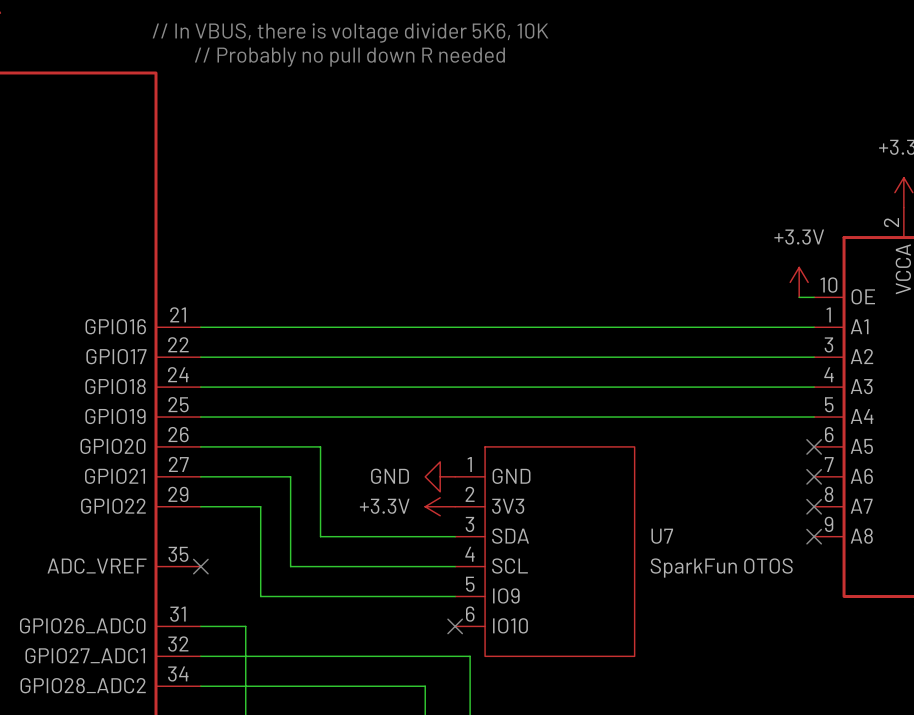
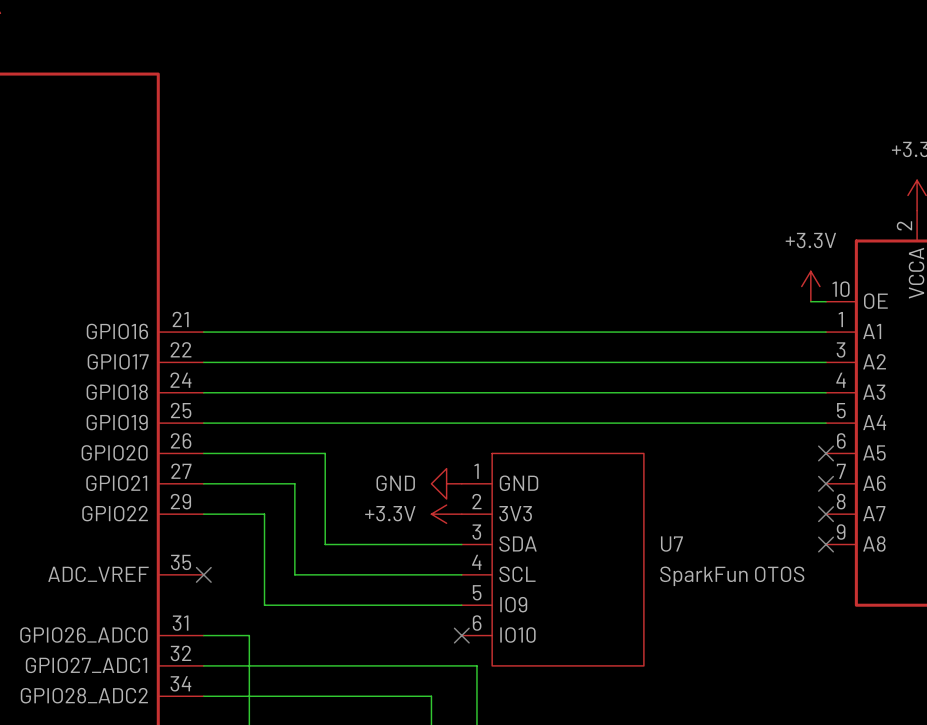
text: // In VBUS, there is voltage divider 5K6, 10K (350, 33) -> none
text: // Probably no pull down R needed (349, 57) -> none

